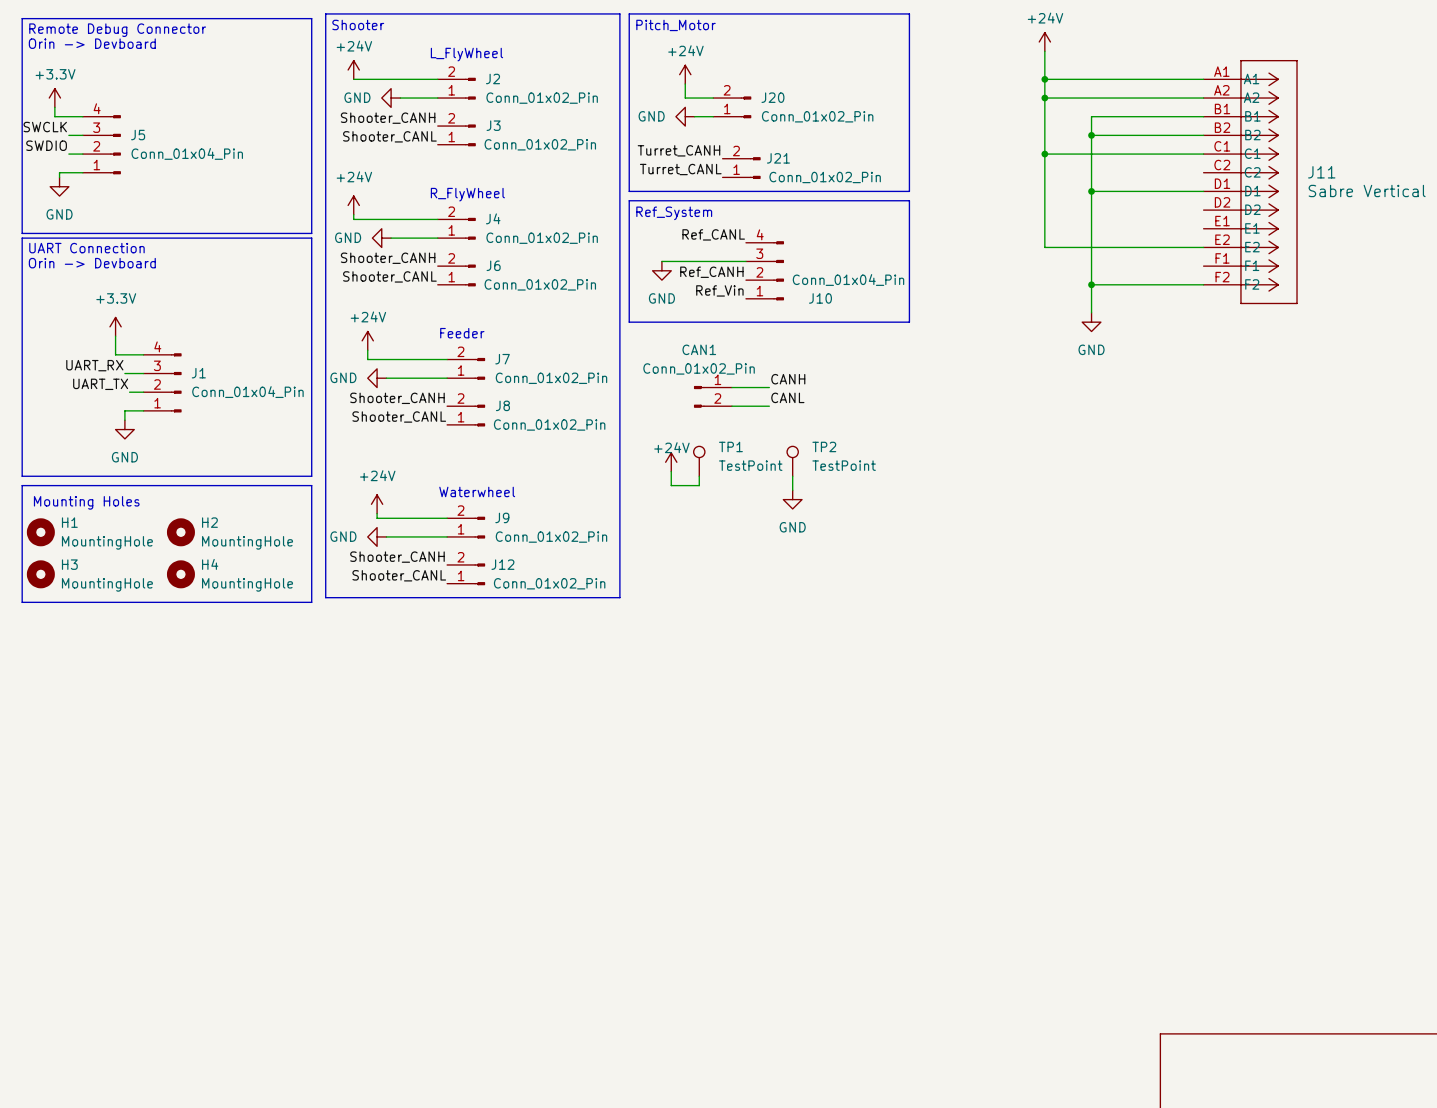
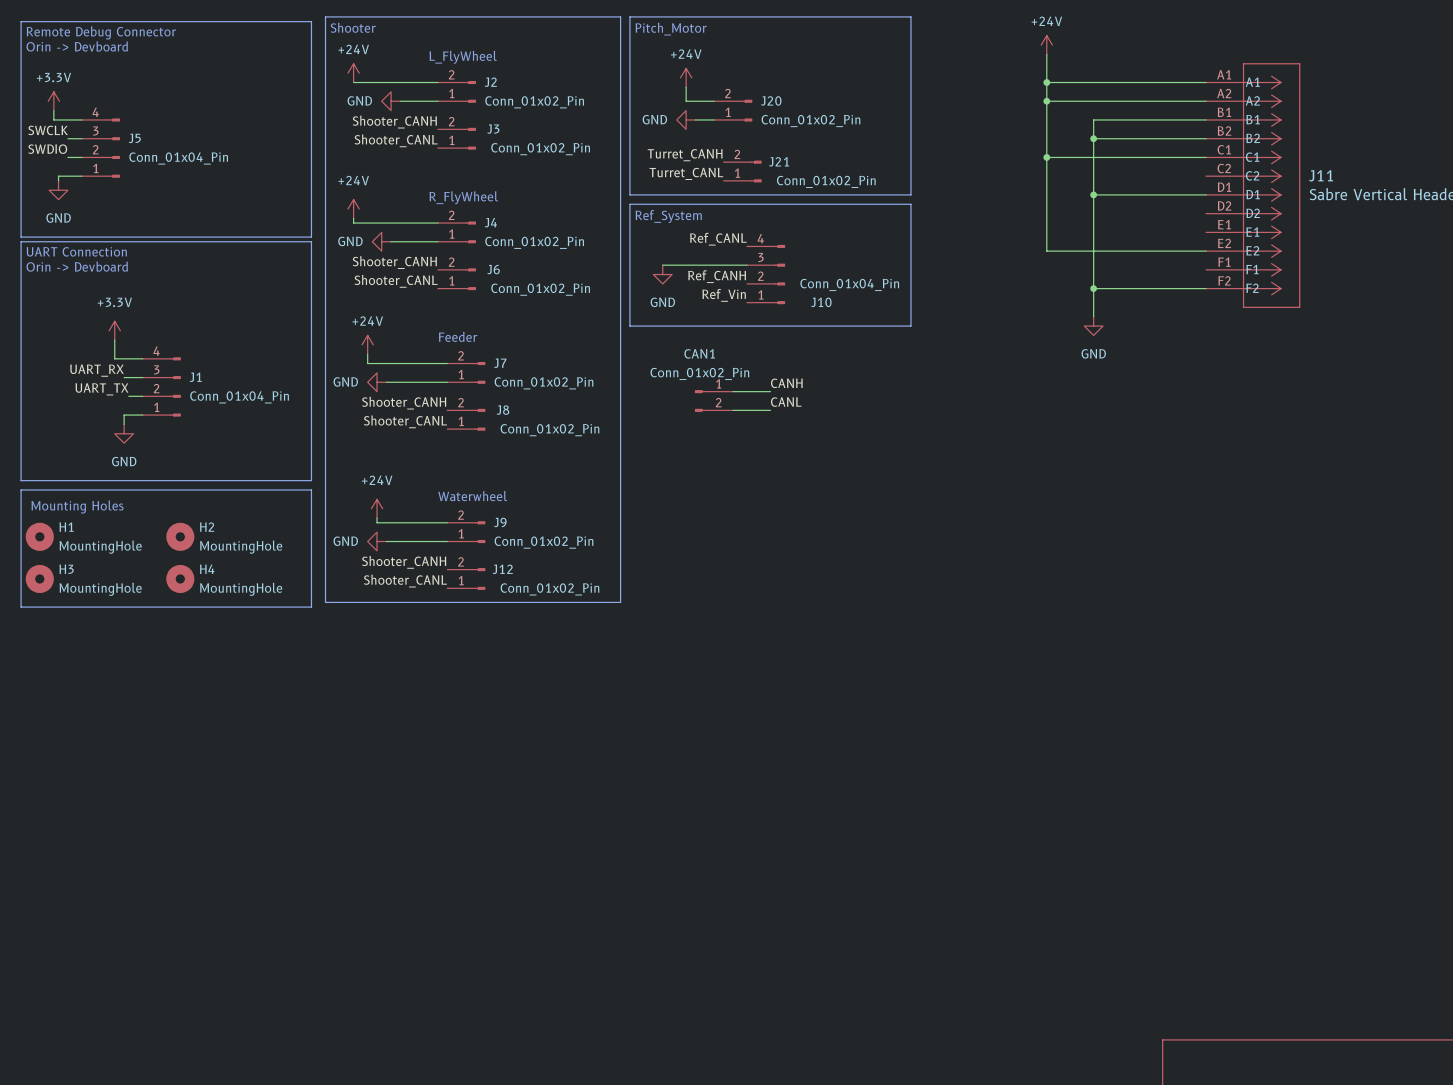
TP1: TestPoint (699, 461) -> none
TP2: TestPoint (792, 461) -> none
power symbol: +24V (671, 462) -> none
wire: (671, 471) (671, 485) (699, 485) (699, 476) -> none
wire: (792, 476) (792, 490) -> none
power symbol: GND (792, 499) -> none

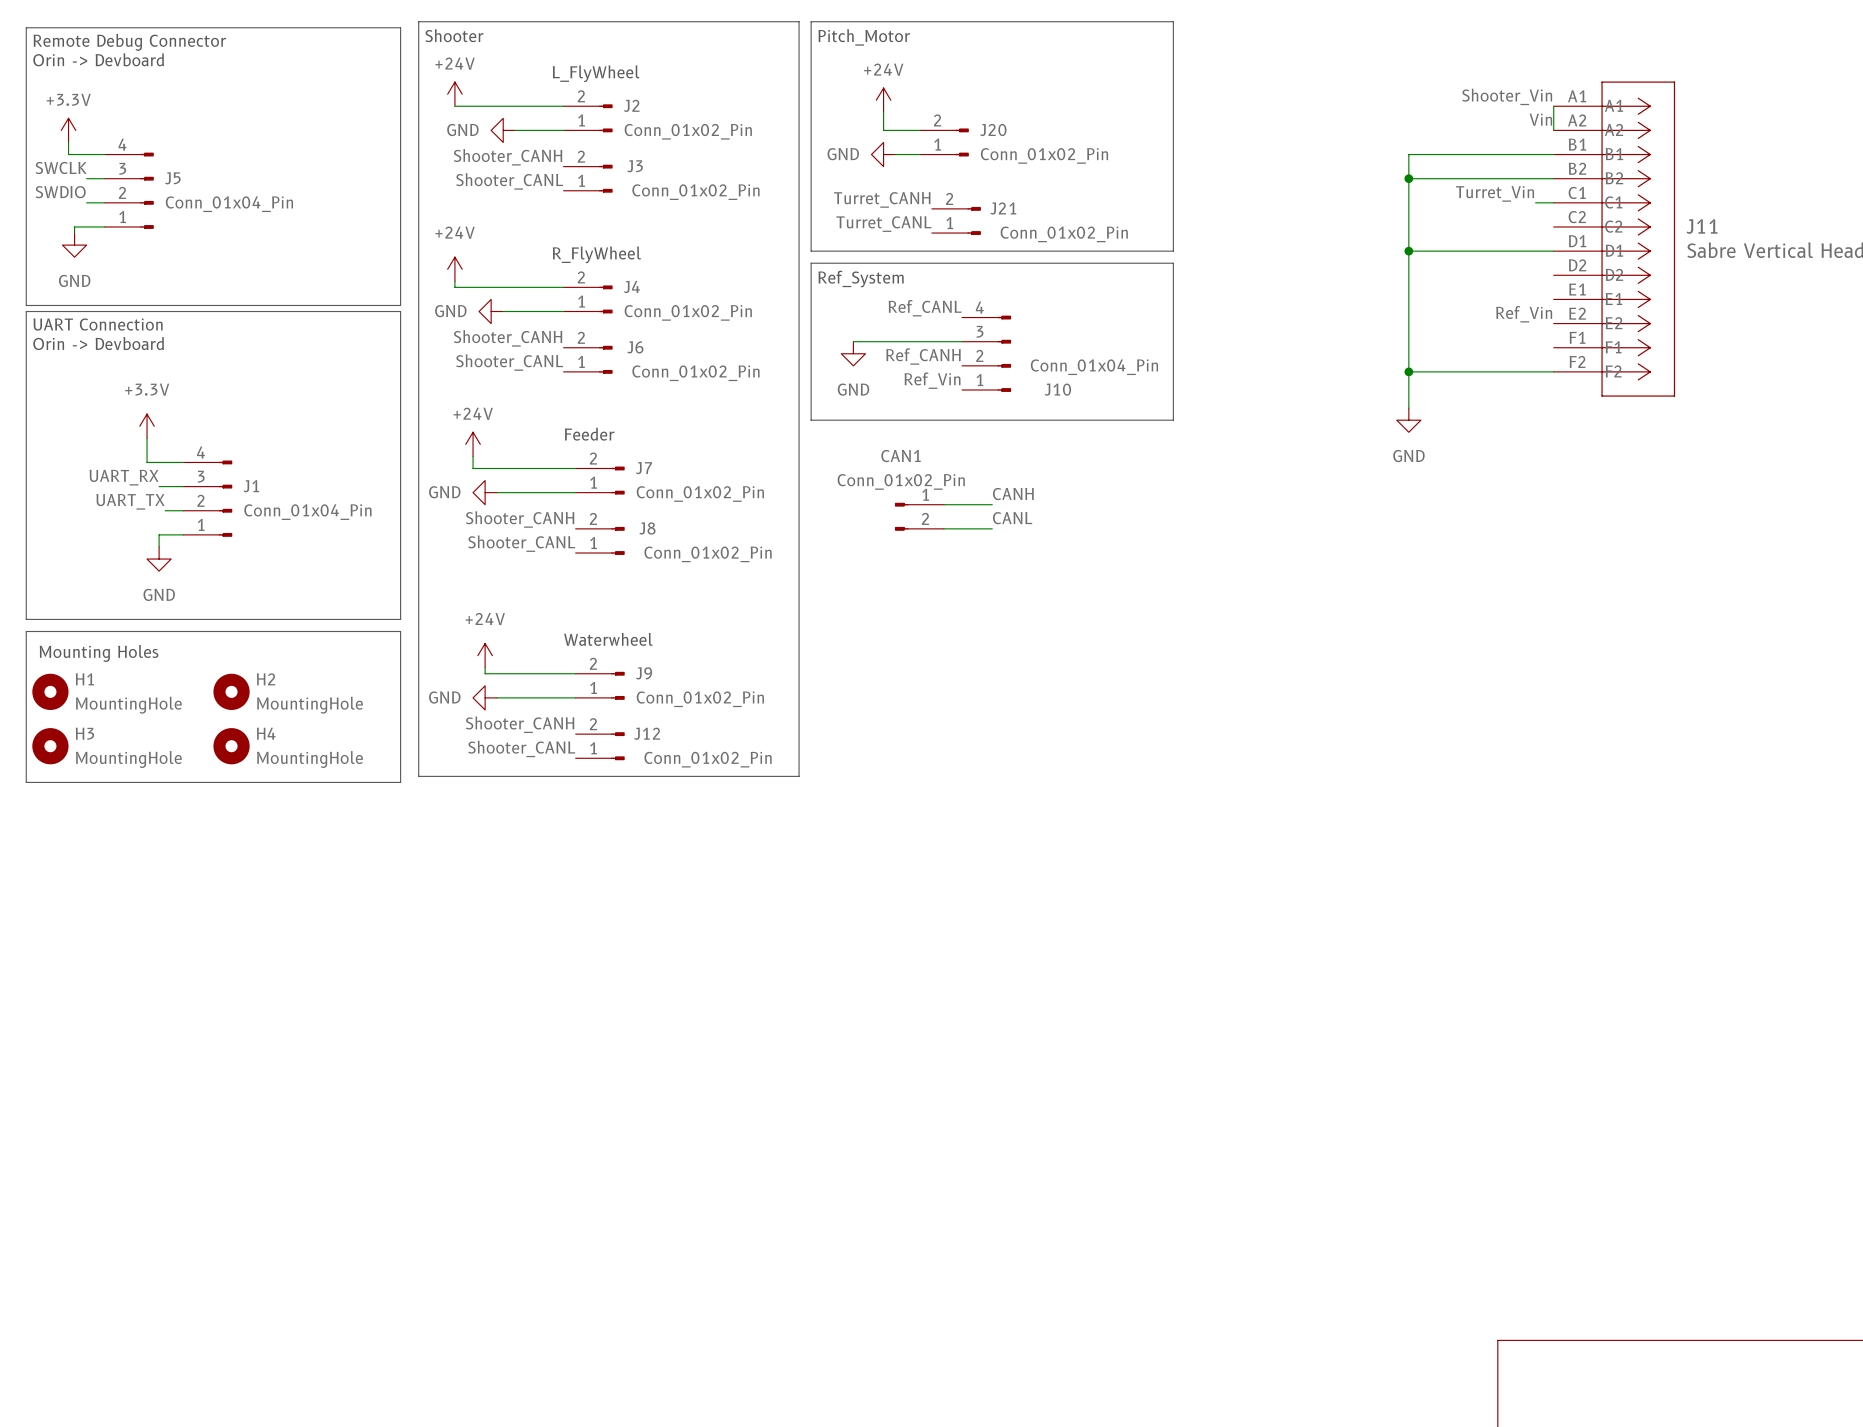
power symbol: +24V (1046, 45) -> none
wire: (1046, 54) (1046, 251) (1206, 251) -> none
label: none -> Shooter_Vin (1507, 96)
wire: (1046, 82) (1206, 82) -> (1553, 130) (1553, 106)
junction: (1046, 82) -> none
label: none -> Vin (1540, 119)
wire: (1046, 101) (1206, 101) -> none
junction: (1046, 101) -> none
label: none -> Turret_Vin (1495, 193)
wire: (1046, 157) (1191, 157) -> none
junction: (1046, 157) -> none
label: none -> Ref_Vin (1524, 314)

